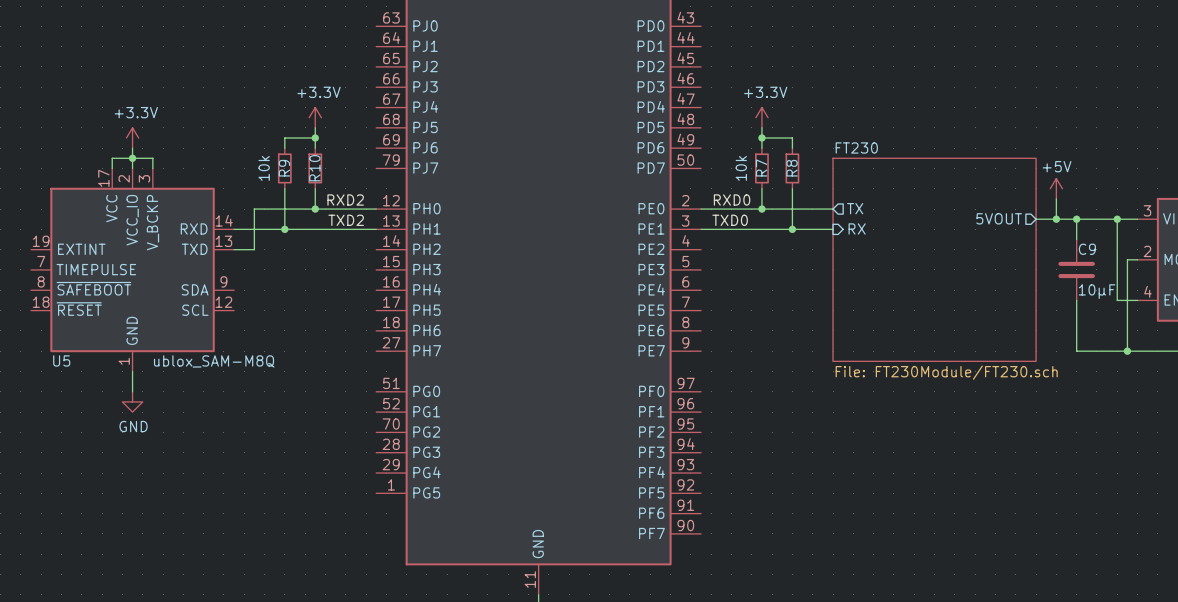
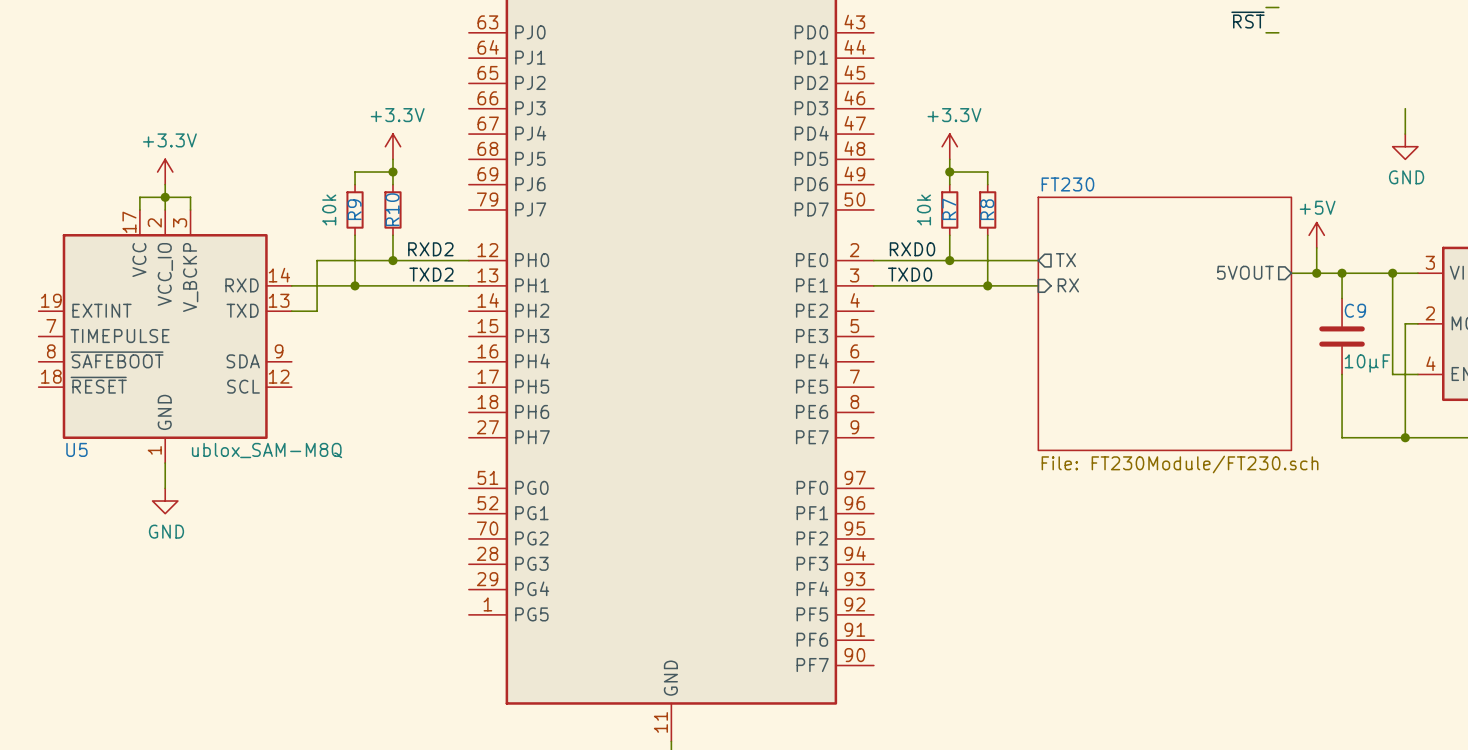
wire: none -> (1266, 7) (1278, 7)
label: none -> ~{RST} (1247, 20)
wire: none -> (1266, 32) (1278, 32)
wire: none -> (1405, 108) (1405, 134)
power symbol: none -> GND (1405, 146)

